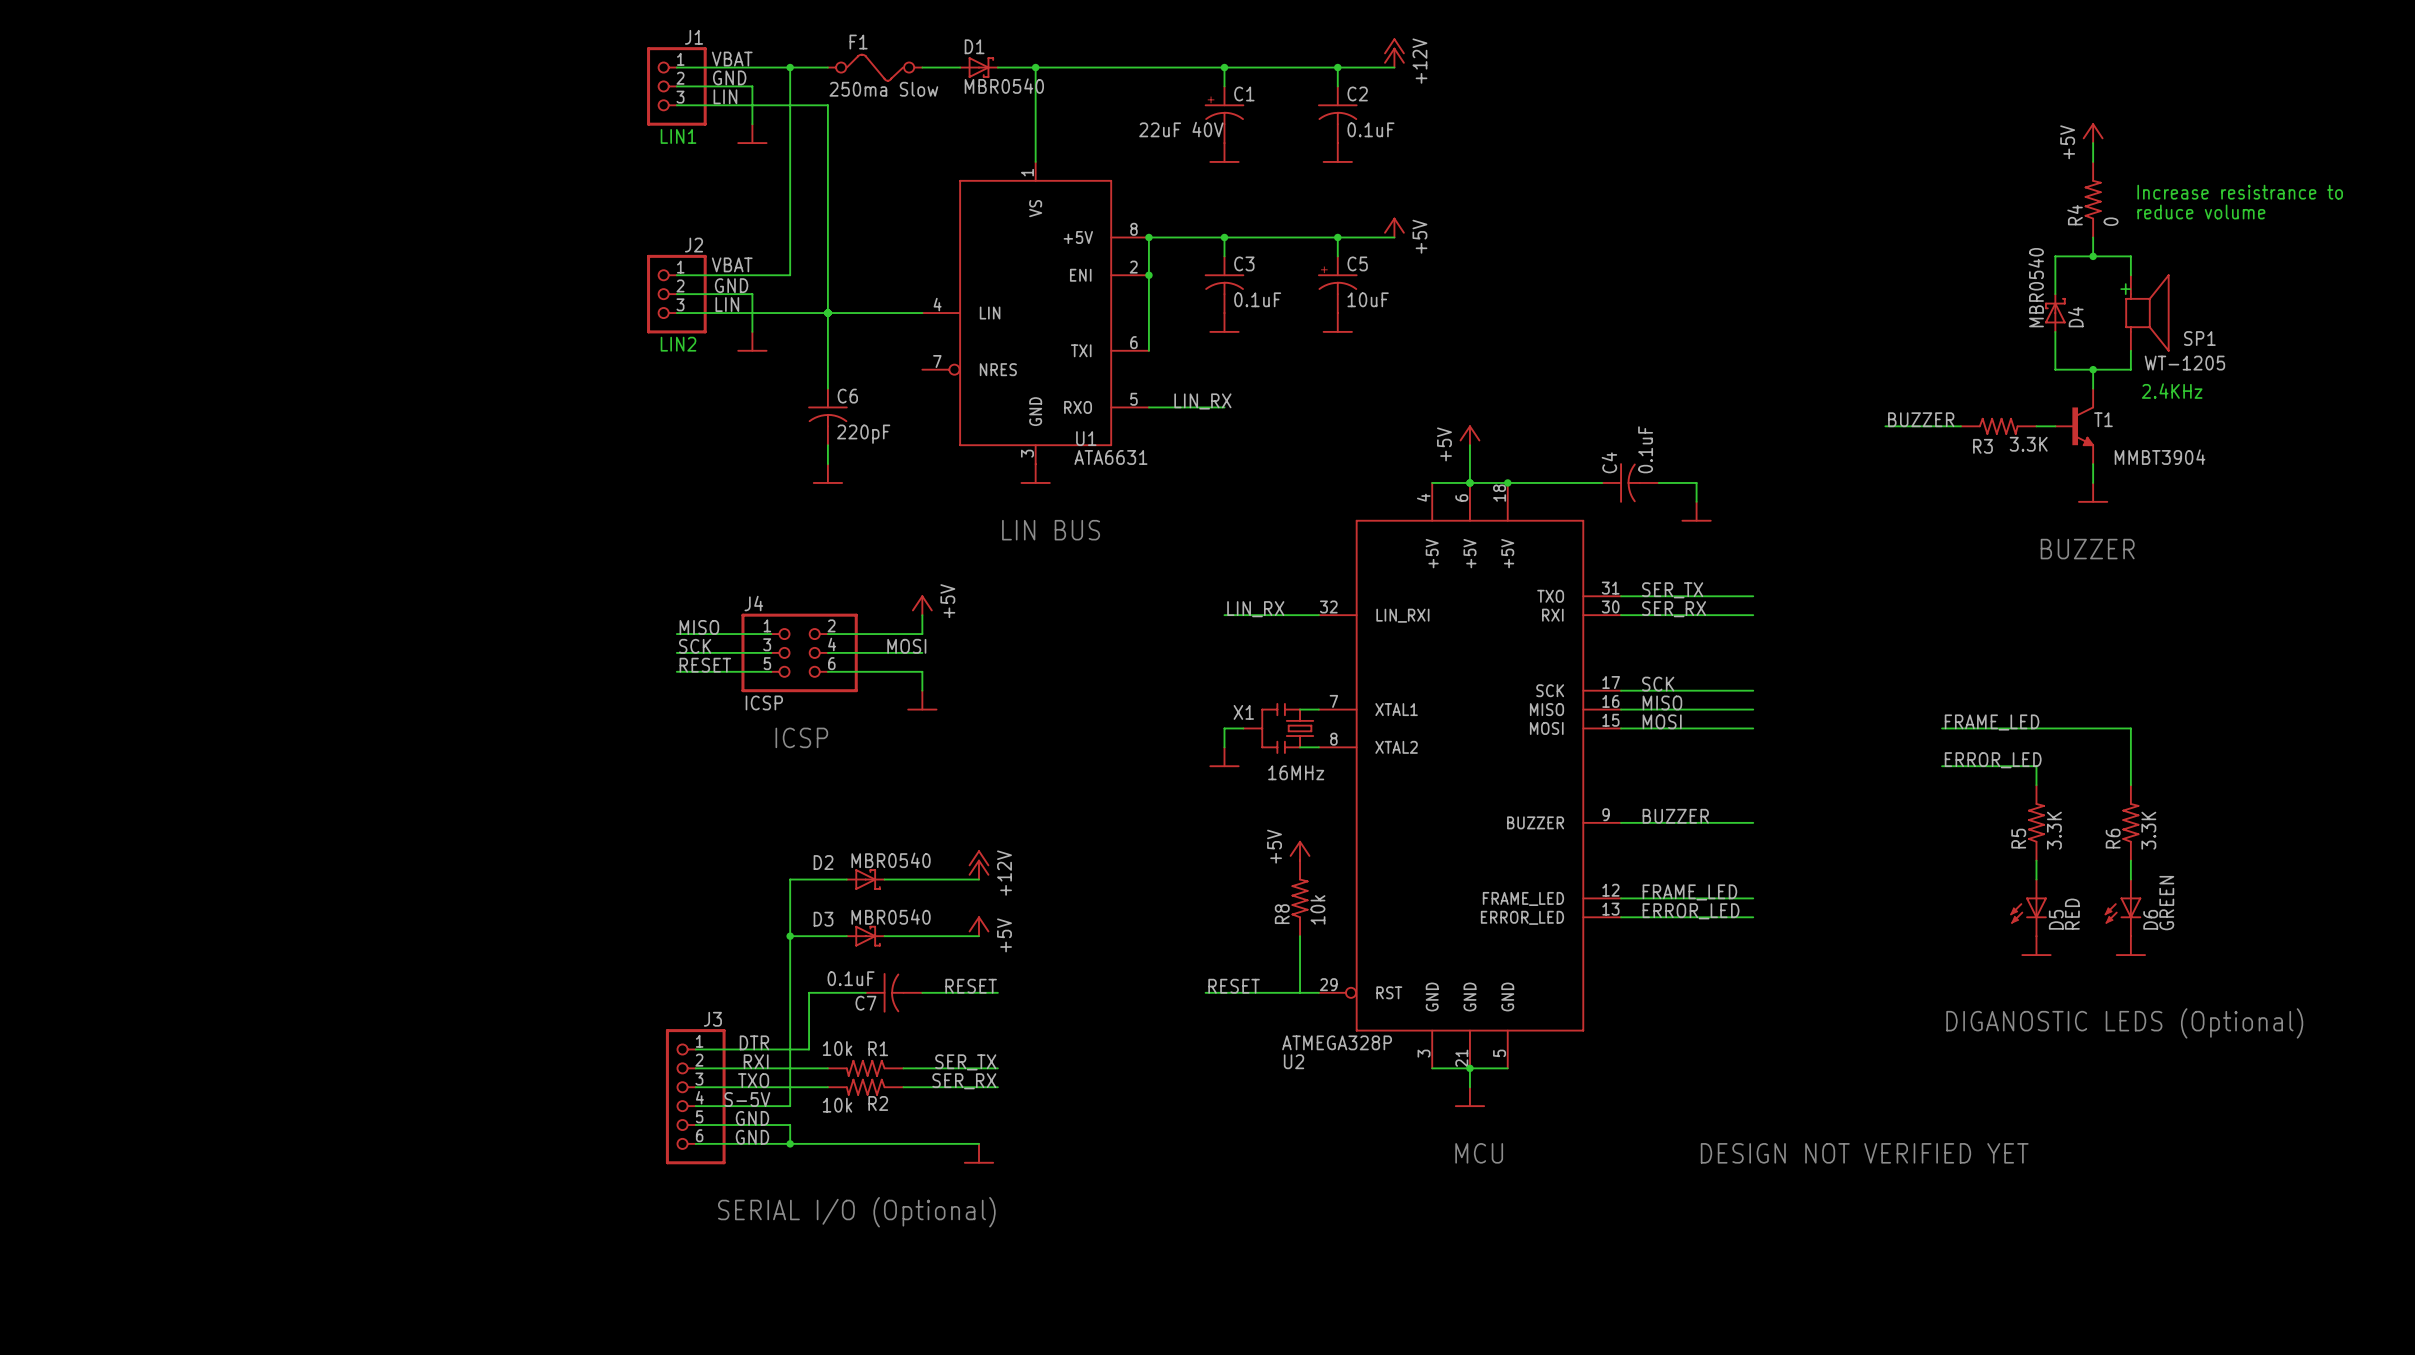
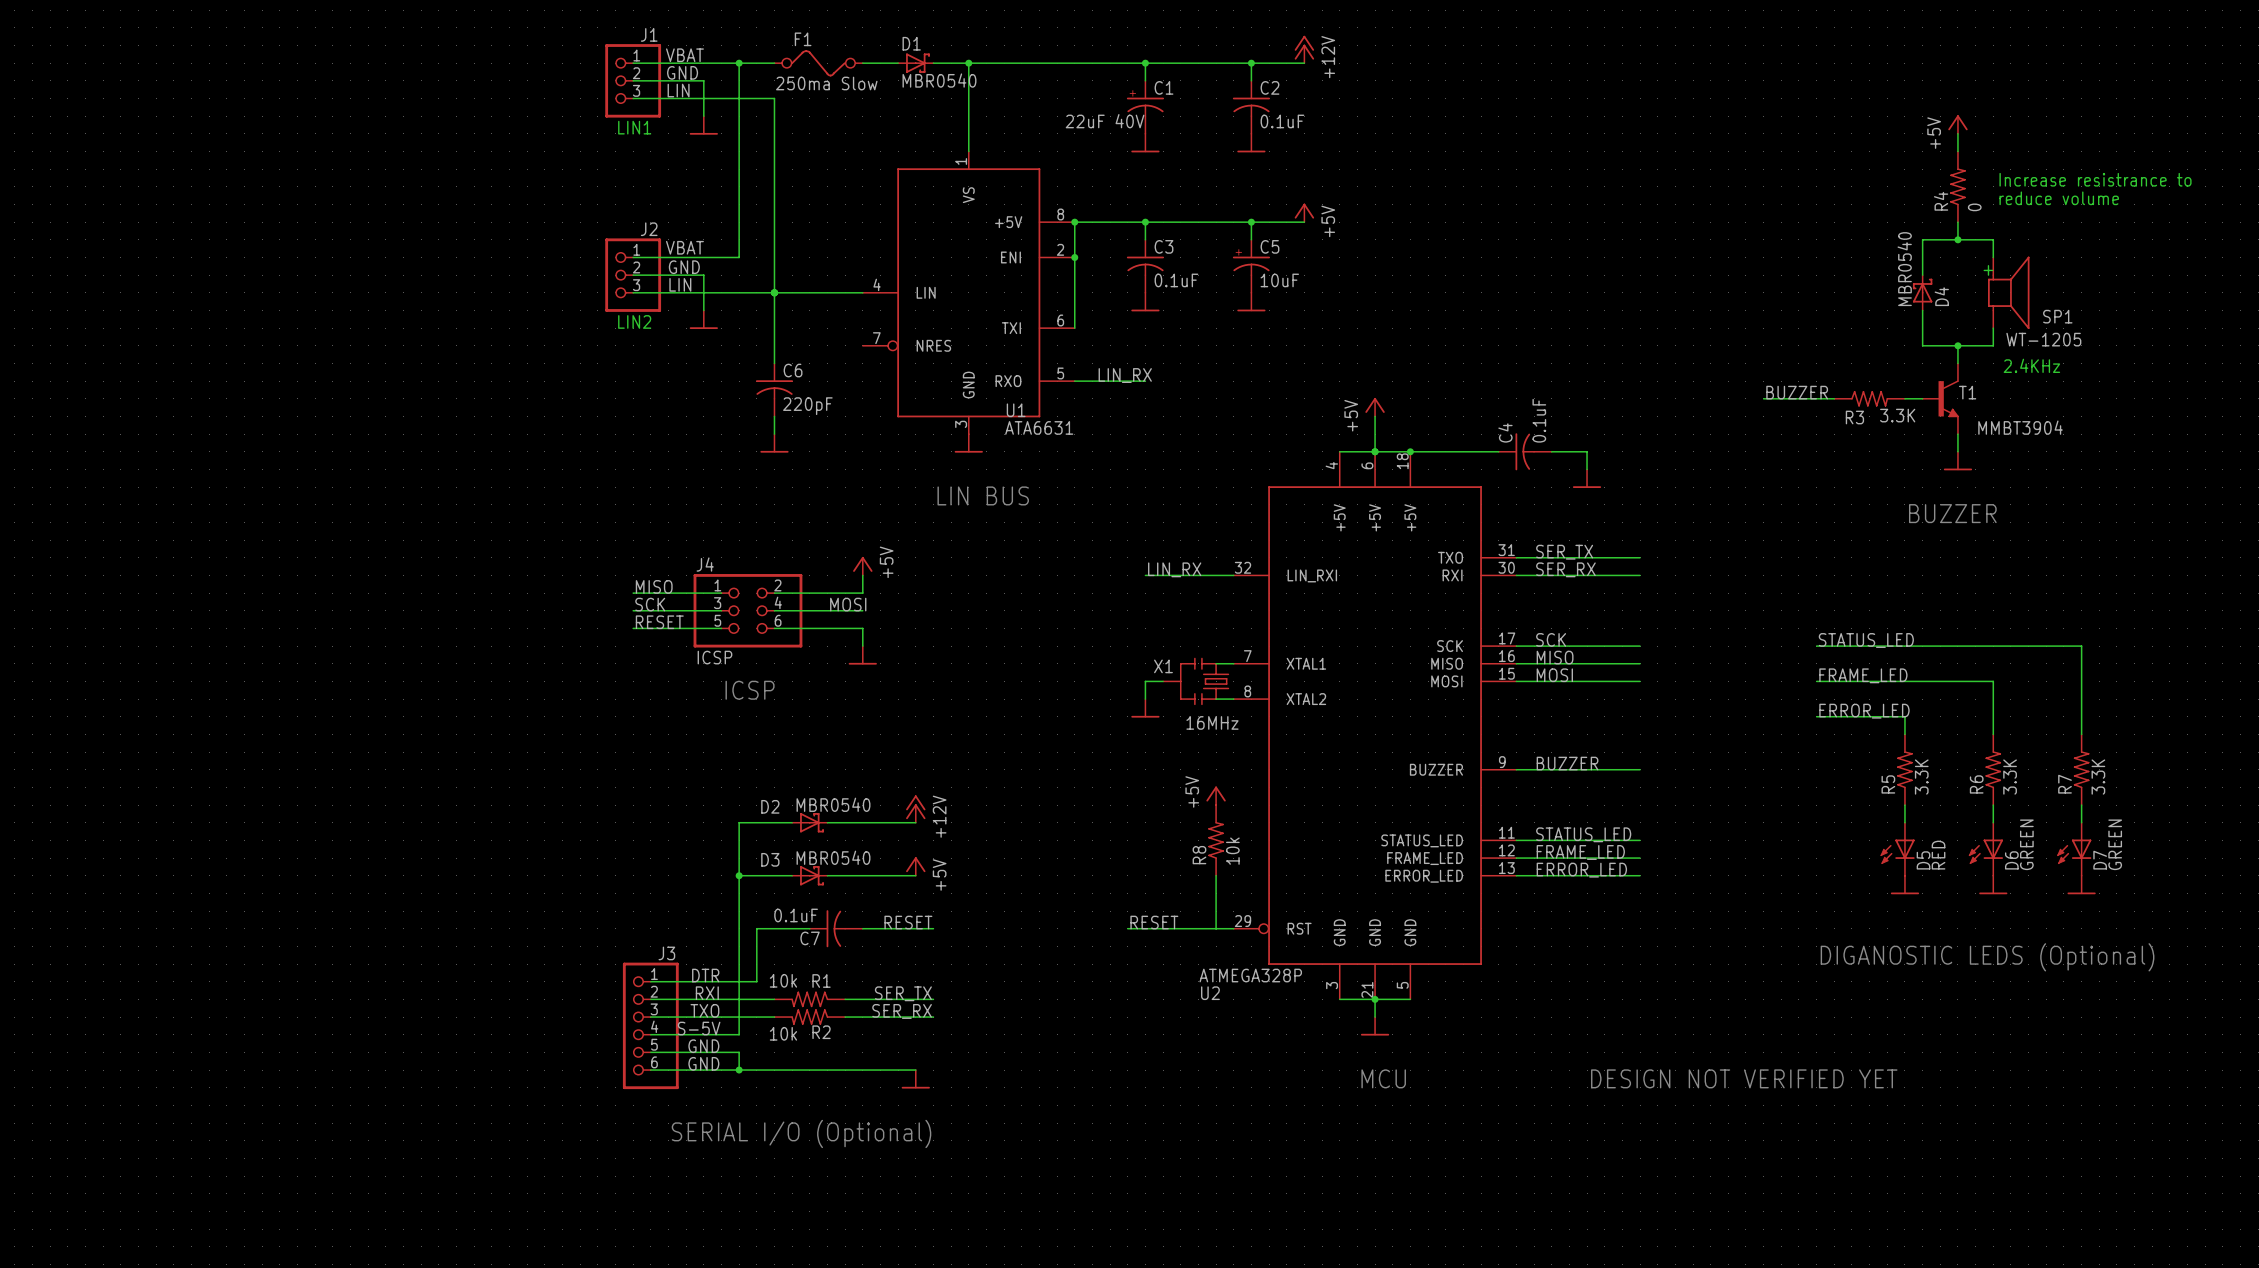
U2 symbol: [1318, 482, 1622, 1069] -> [1233, 451, 1517, 1000]
label: none -> STATUS_LED (1866, 640)
wire: none -> (1816, 646) (2081, 646) (2081, 734)
R7: none -> 3.3K (2081, 769)
wire: none -> (2081, 805) (2081, 822)
label: FRAME_LED (1689, 892) -> STATUS_LED (1583, 834)
D7: none -> GREEN (2074, 849)
label: ERROR_LED (1691, 911) -> FRAME_LED (1580, 852)
label: none -> ERROR_LED (1581, 870)
wire: none -> (1516, 875) (1640, 875)
power symbol: none -> (2081, 885)

